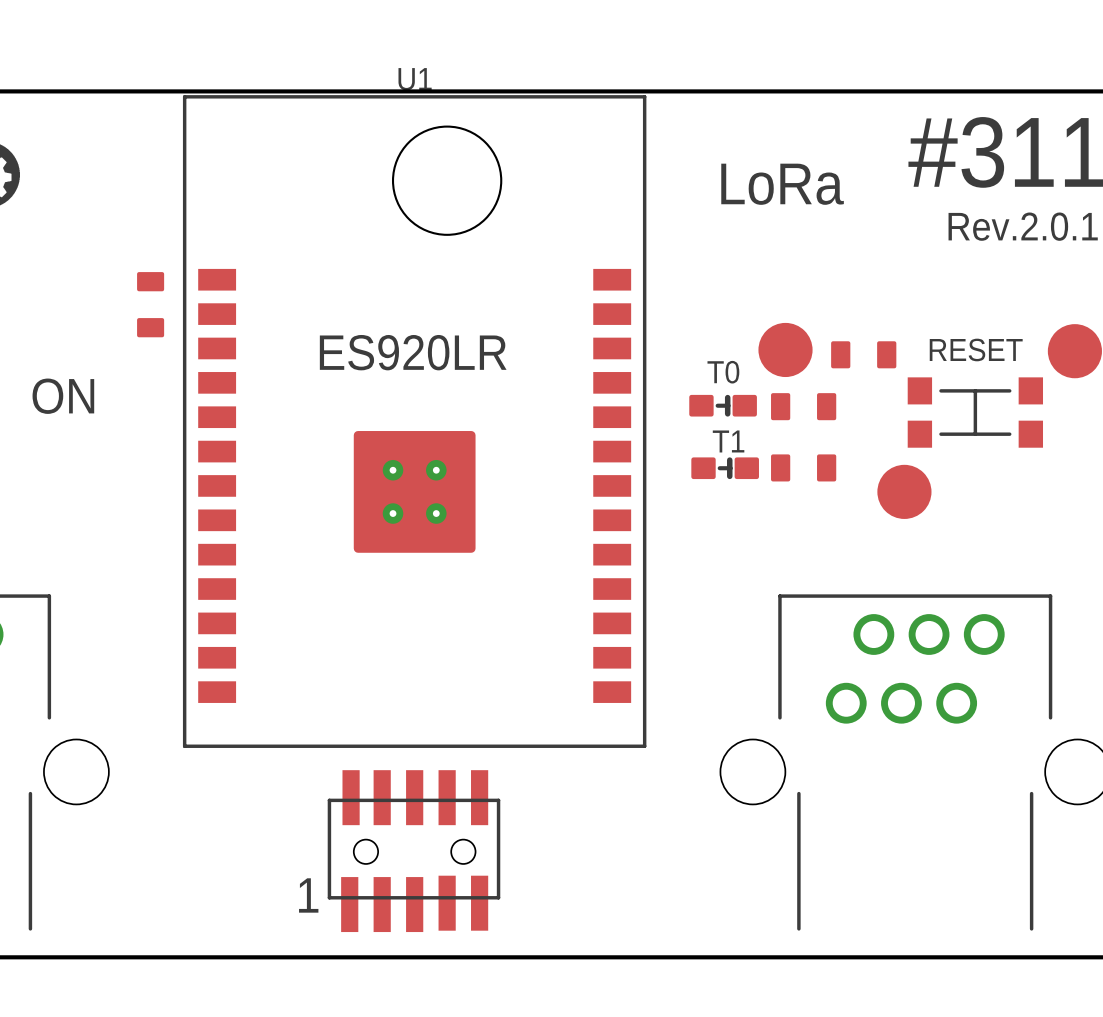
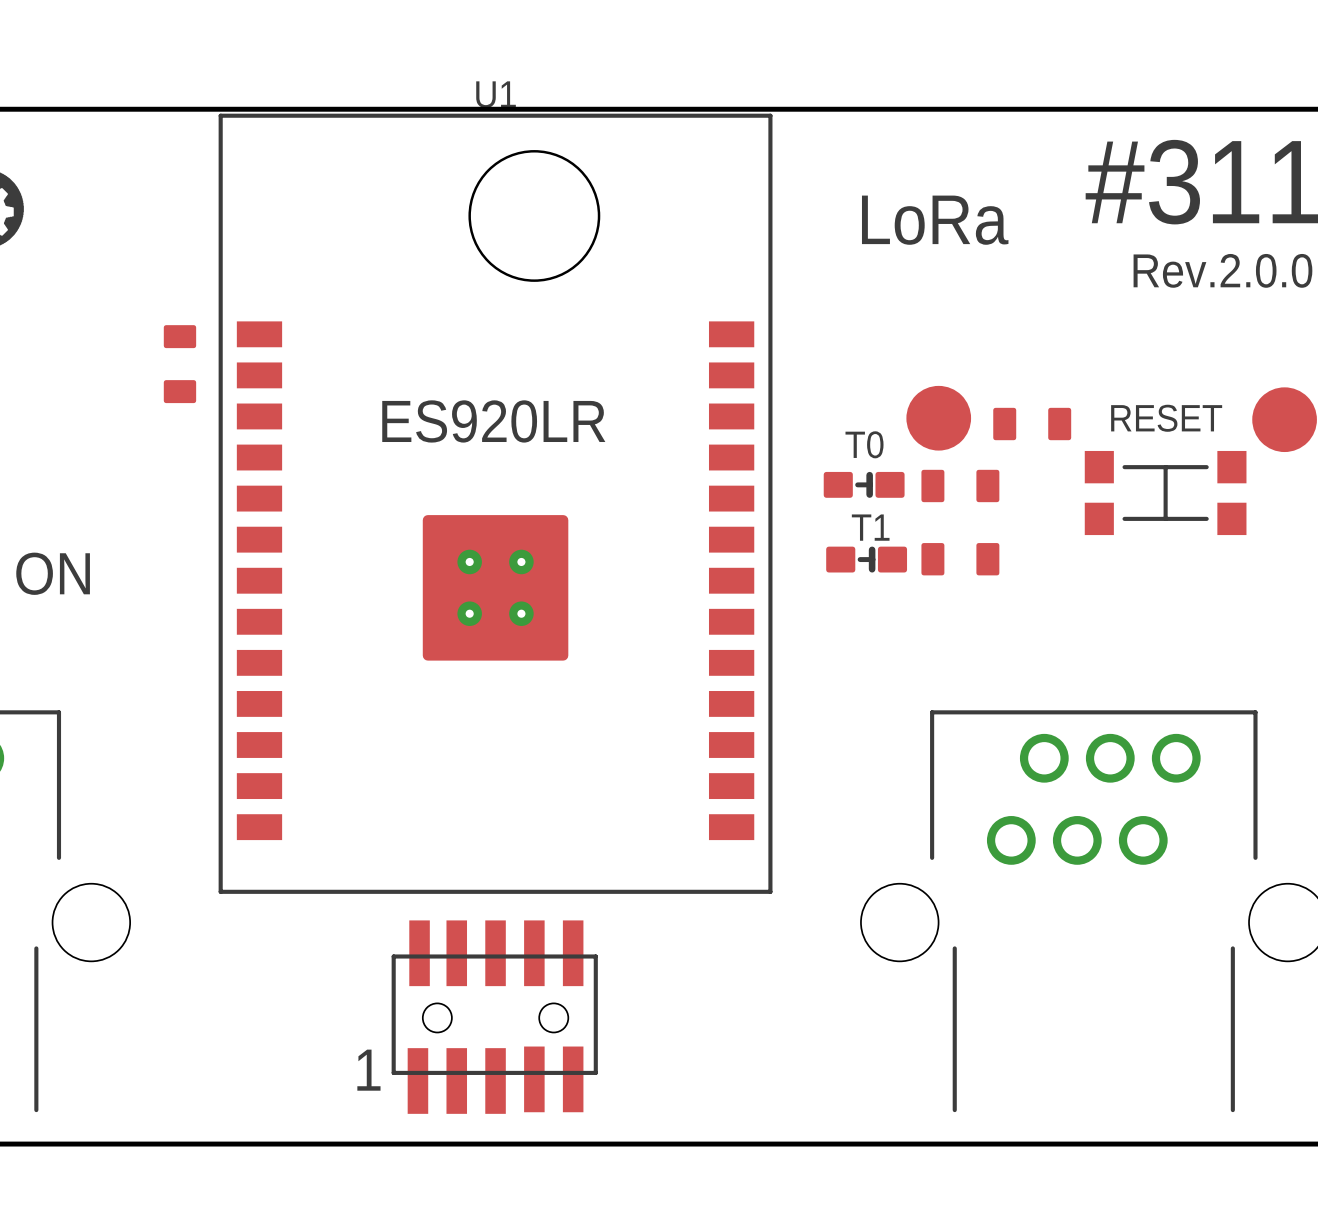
text: Rev.2.0.1 (1023, 226) -> Rev.2.0.0 (1222, 270)
text position: ON (63, 396) -> ON (53, 573)
part: (904, 491) -> none

